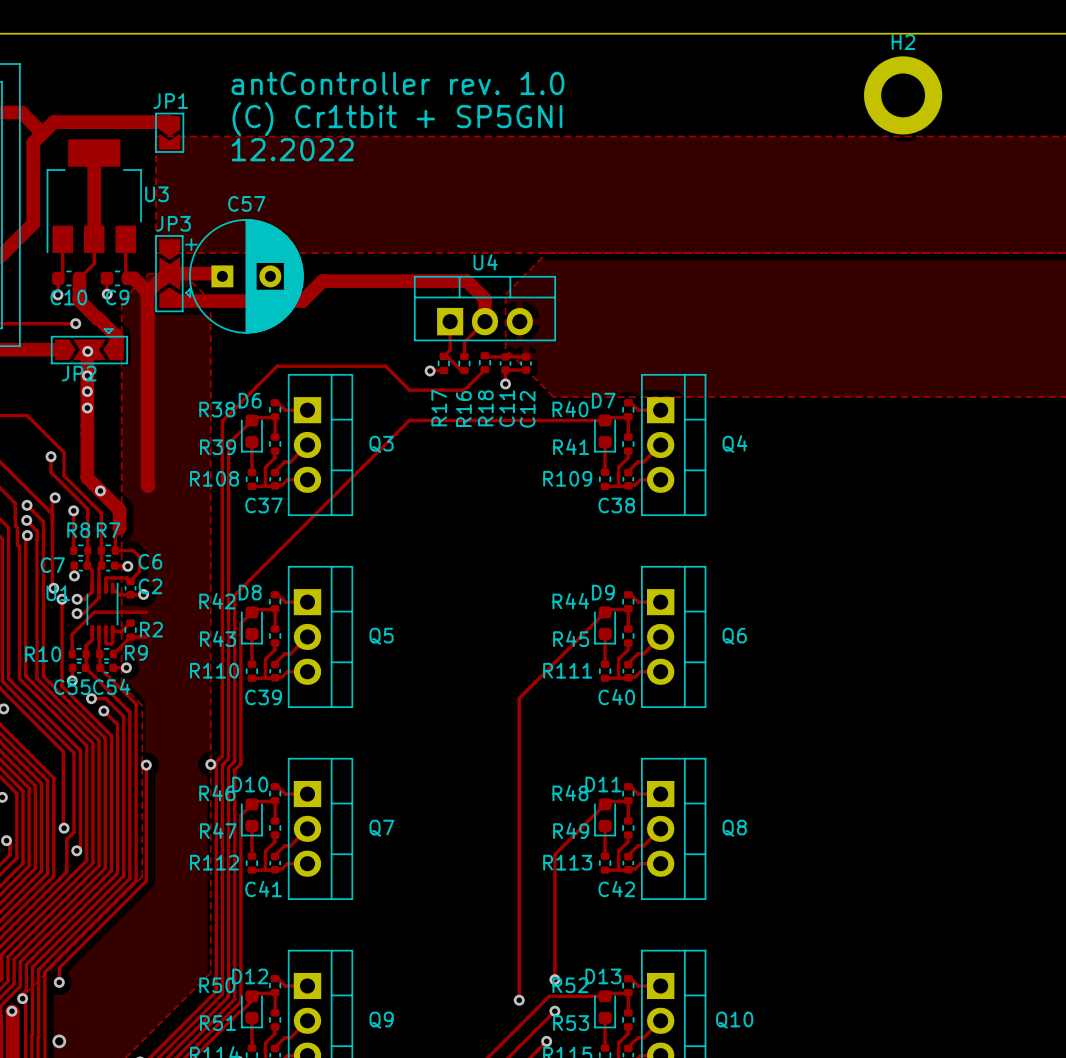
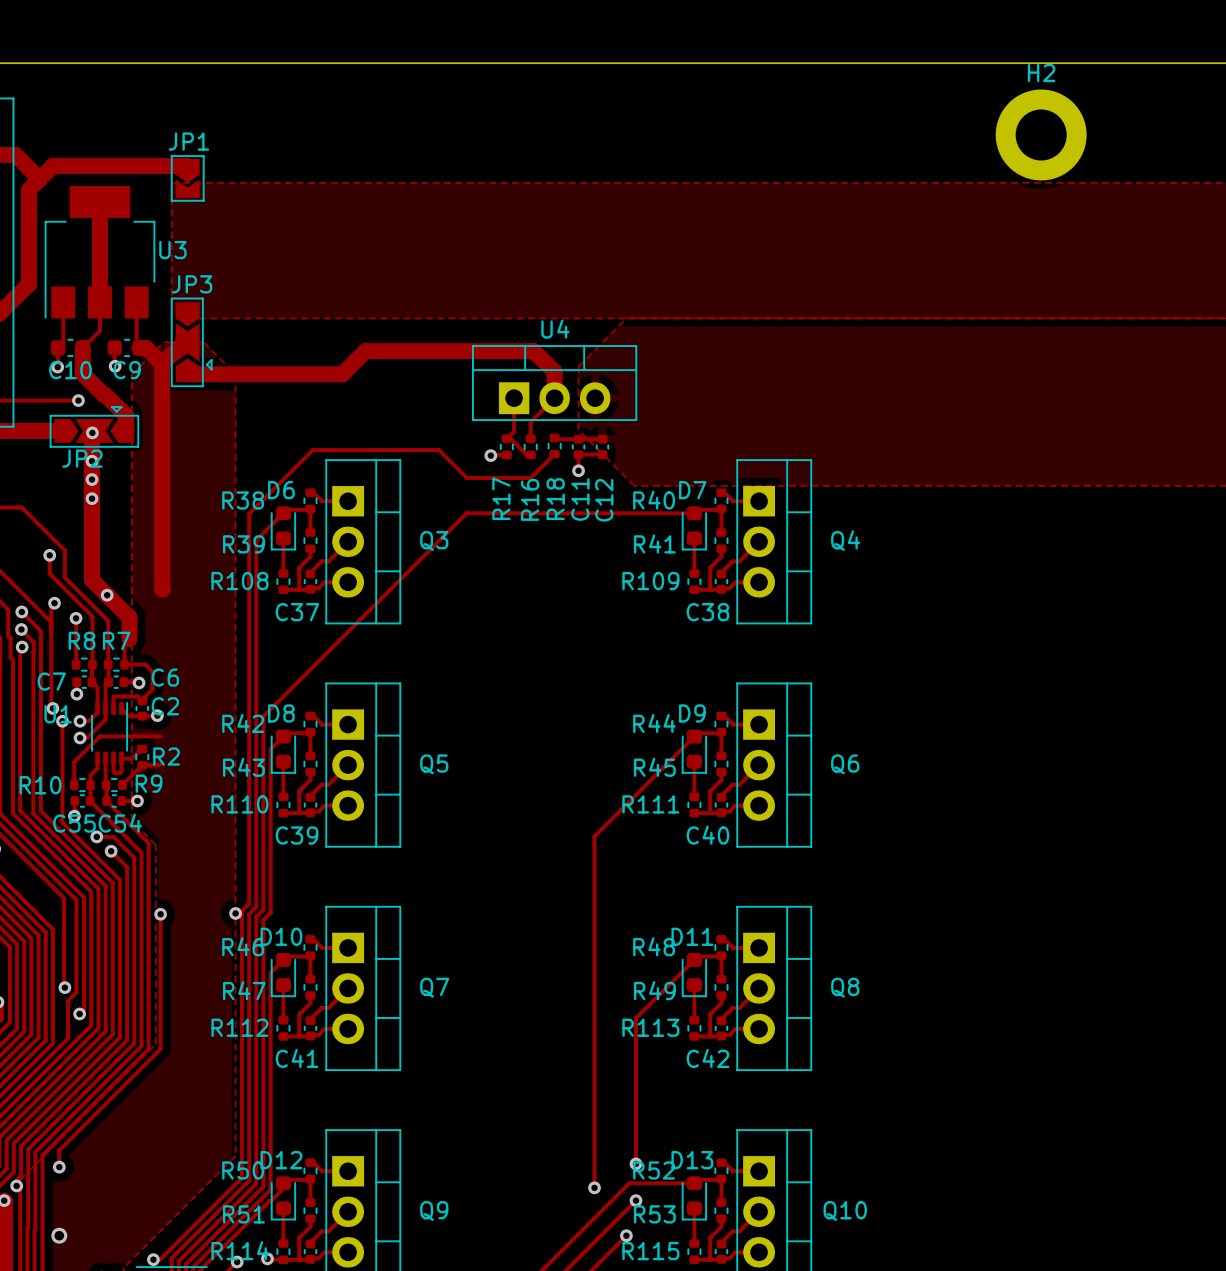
text: antController rev. 1.0 (397, 83) -> none
text: (C) Cr1tbit + SP5GNI (397, 119) -> none
text: 12.2022 (292, 149) -> none
track: (169, 273) (219, 273) (222, 276) -> none
C57: (244, 276) -> none

